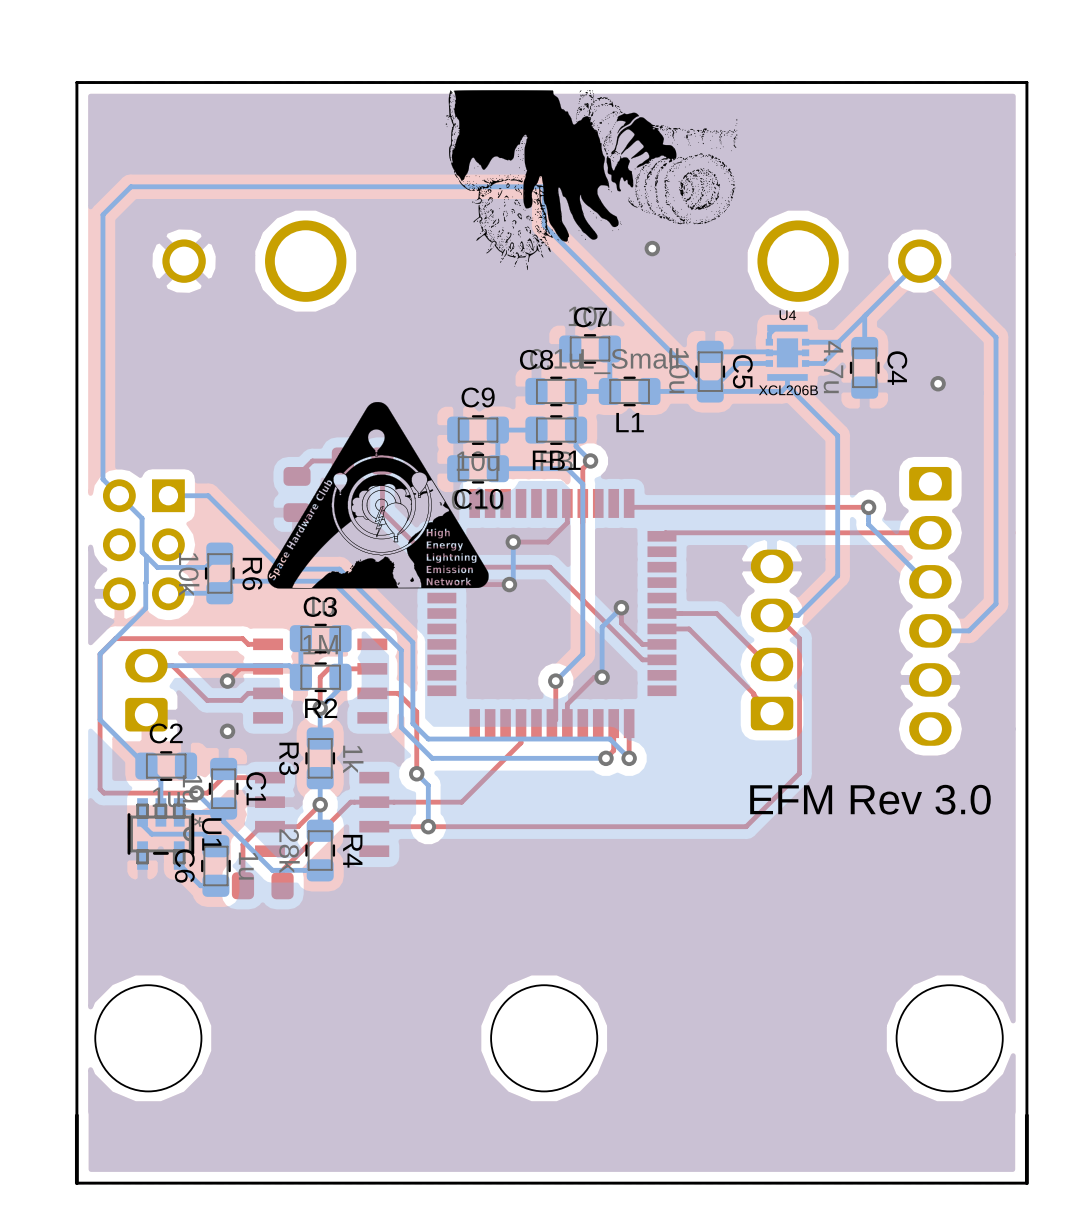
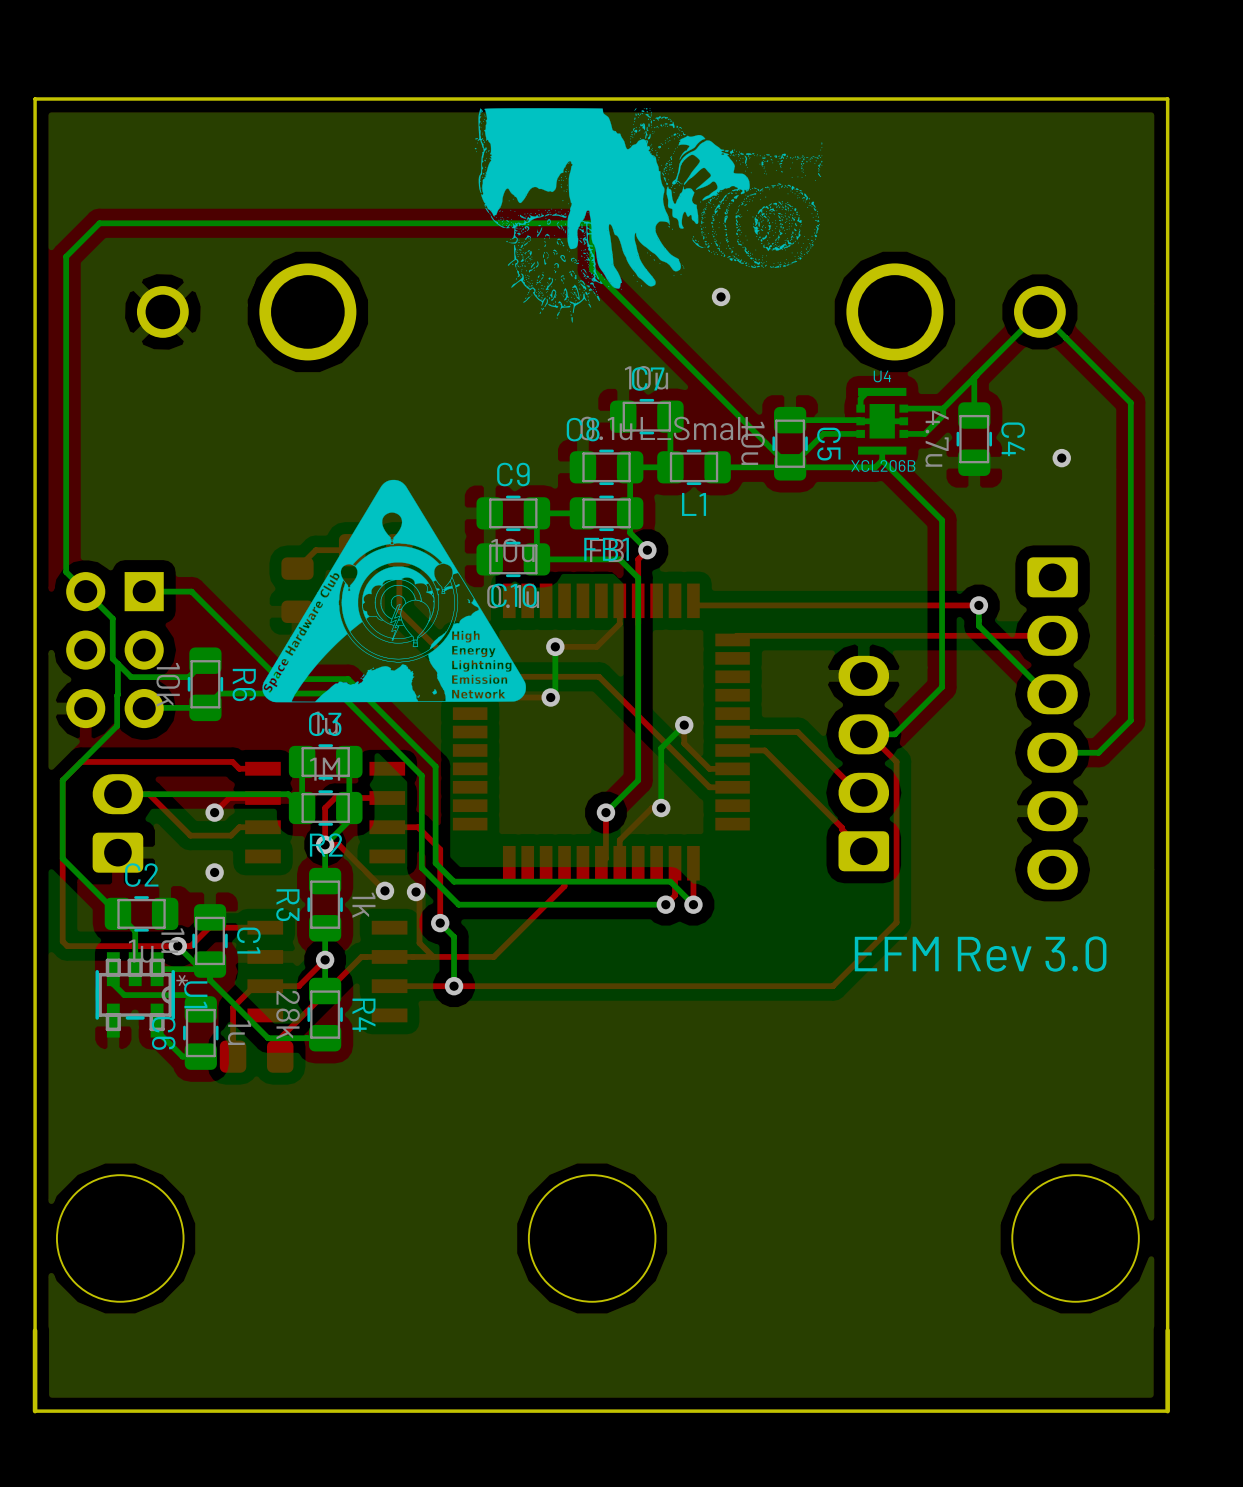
top track: none -> (325, 844) (338, 844) (384, 890)
via: none -> (384, 890)
top track: none -> (416, 892) (419, 895) (419, 943) (433, 956)
via: none -> (416, 892)

